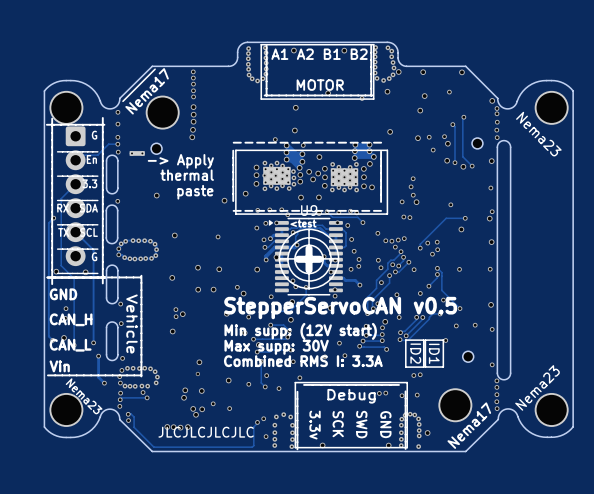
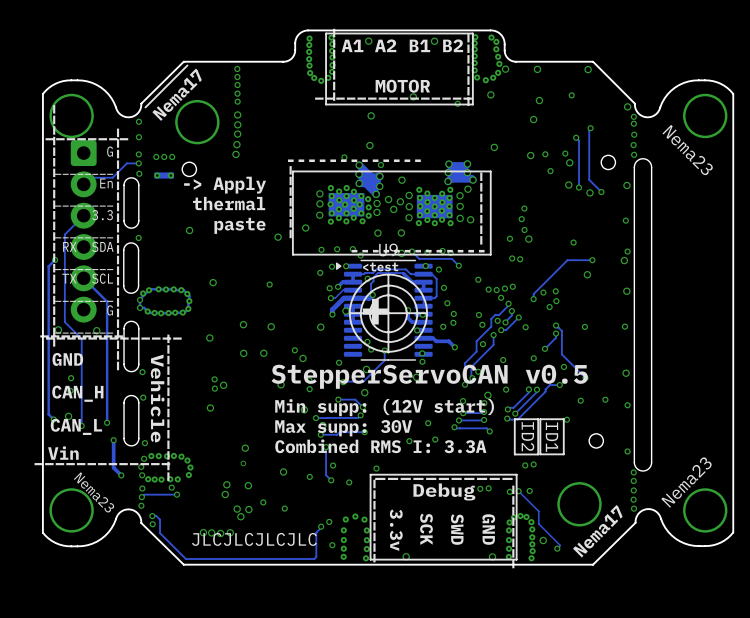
via: none -> (156, 157)
via: none -> (164, 157)
via: none -> (172, 157)
via: (293, 361) -> none
track: none -> (518, 491) (538, 511) (538, 524) (559, 544) (557, 548)
via: none -> (518, 491)
via: none -> (557, 548)
via: none -> (532, 551)

